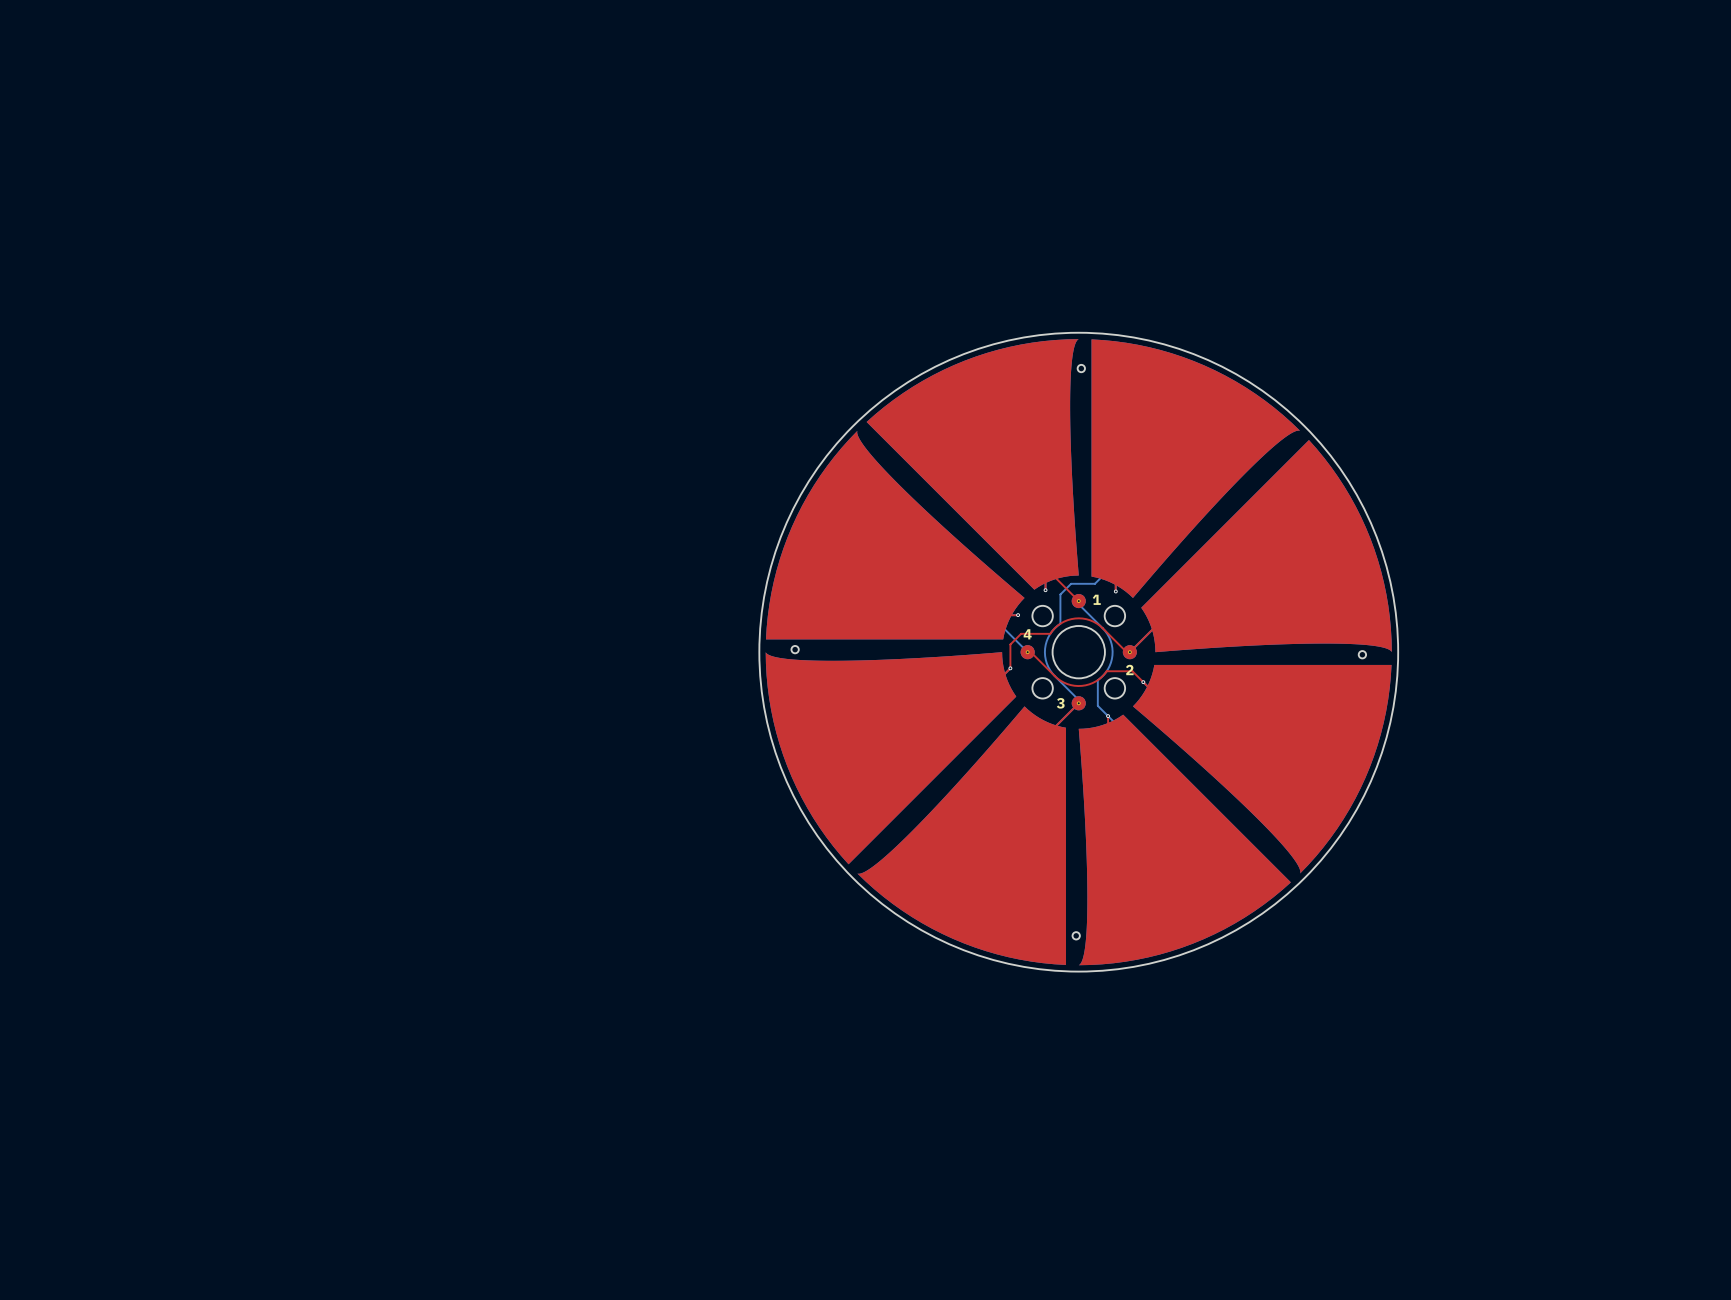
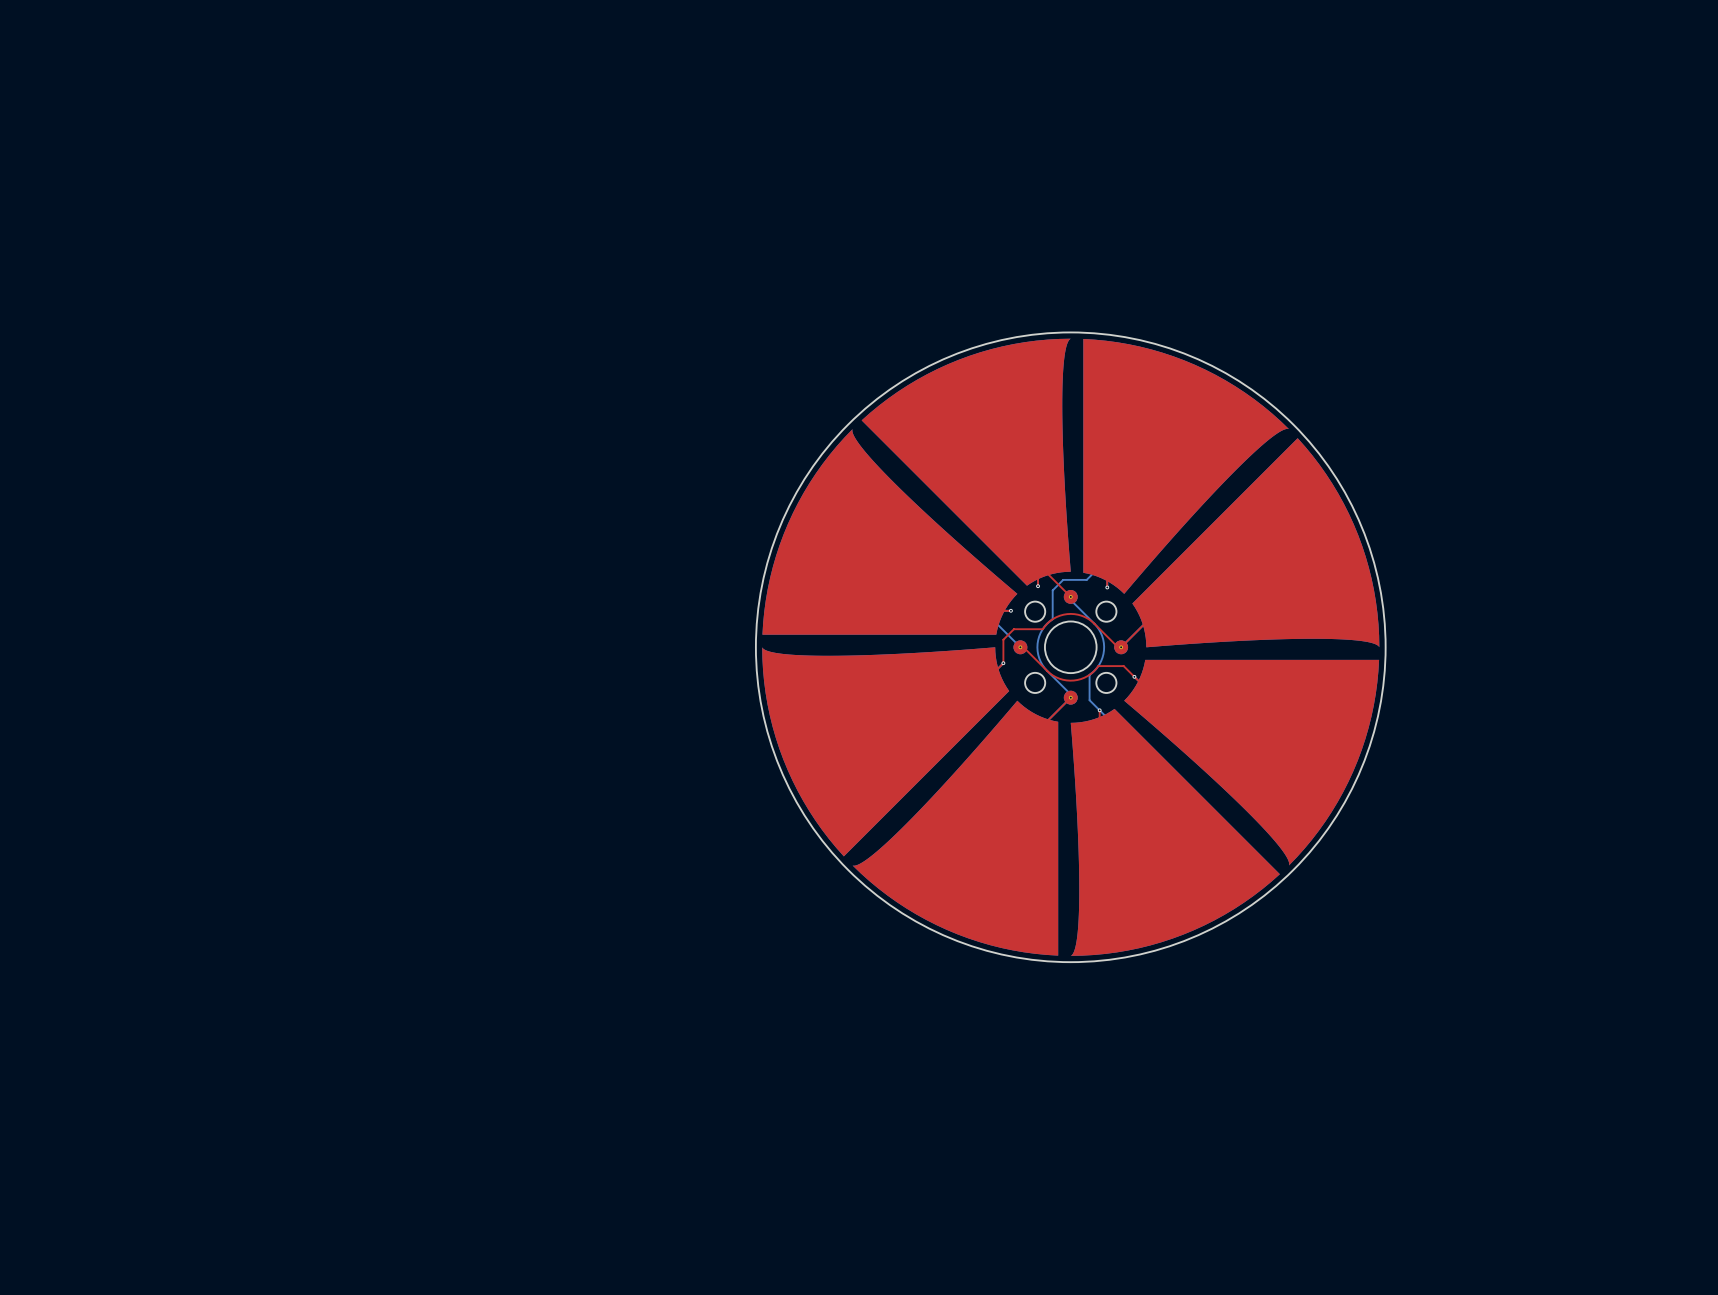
part: (1081, 368) -> none
text: 1 (1096, 599) -> none
text: 4 (1027, 634) -> none
part: (795, 649) -> none
part: (1362, 654) -> none
text: 2 (1129, 670) -> none
text: 3 (1060, 703) -> none
part: (1076, 935) -> none

